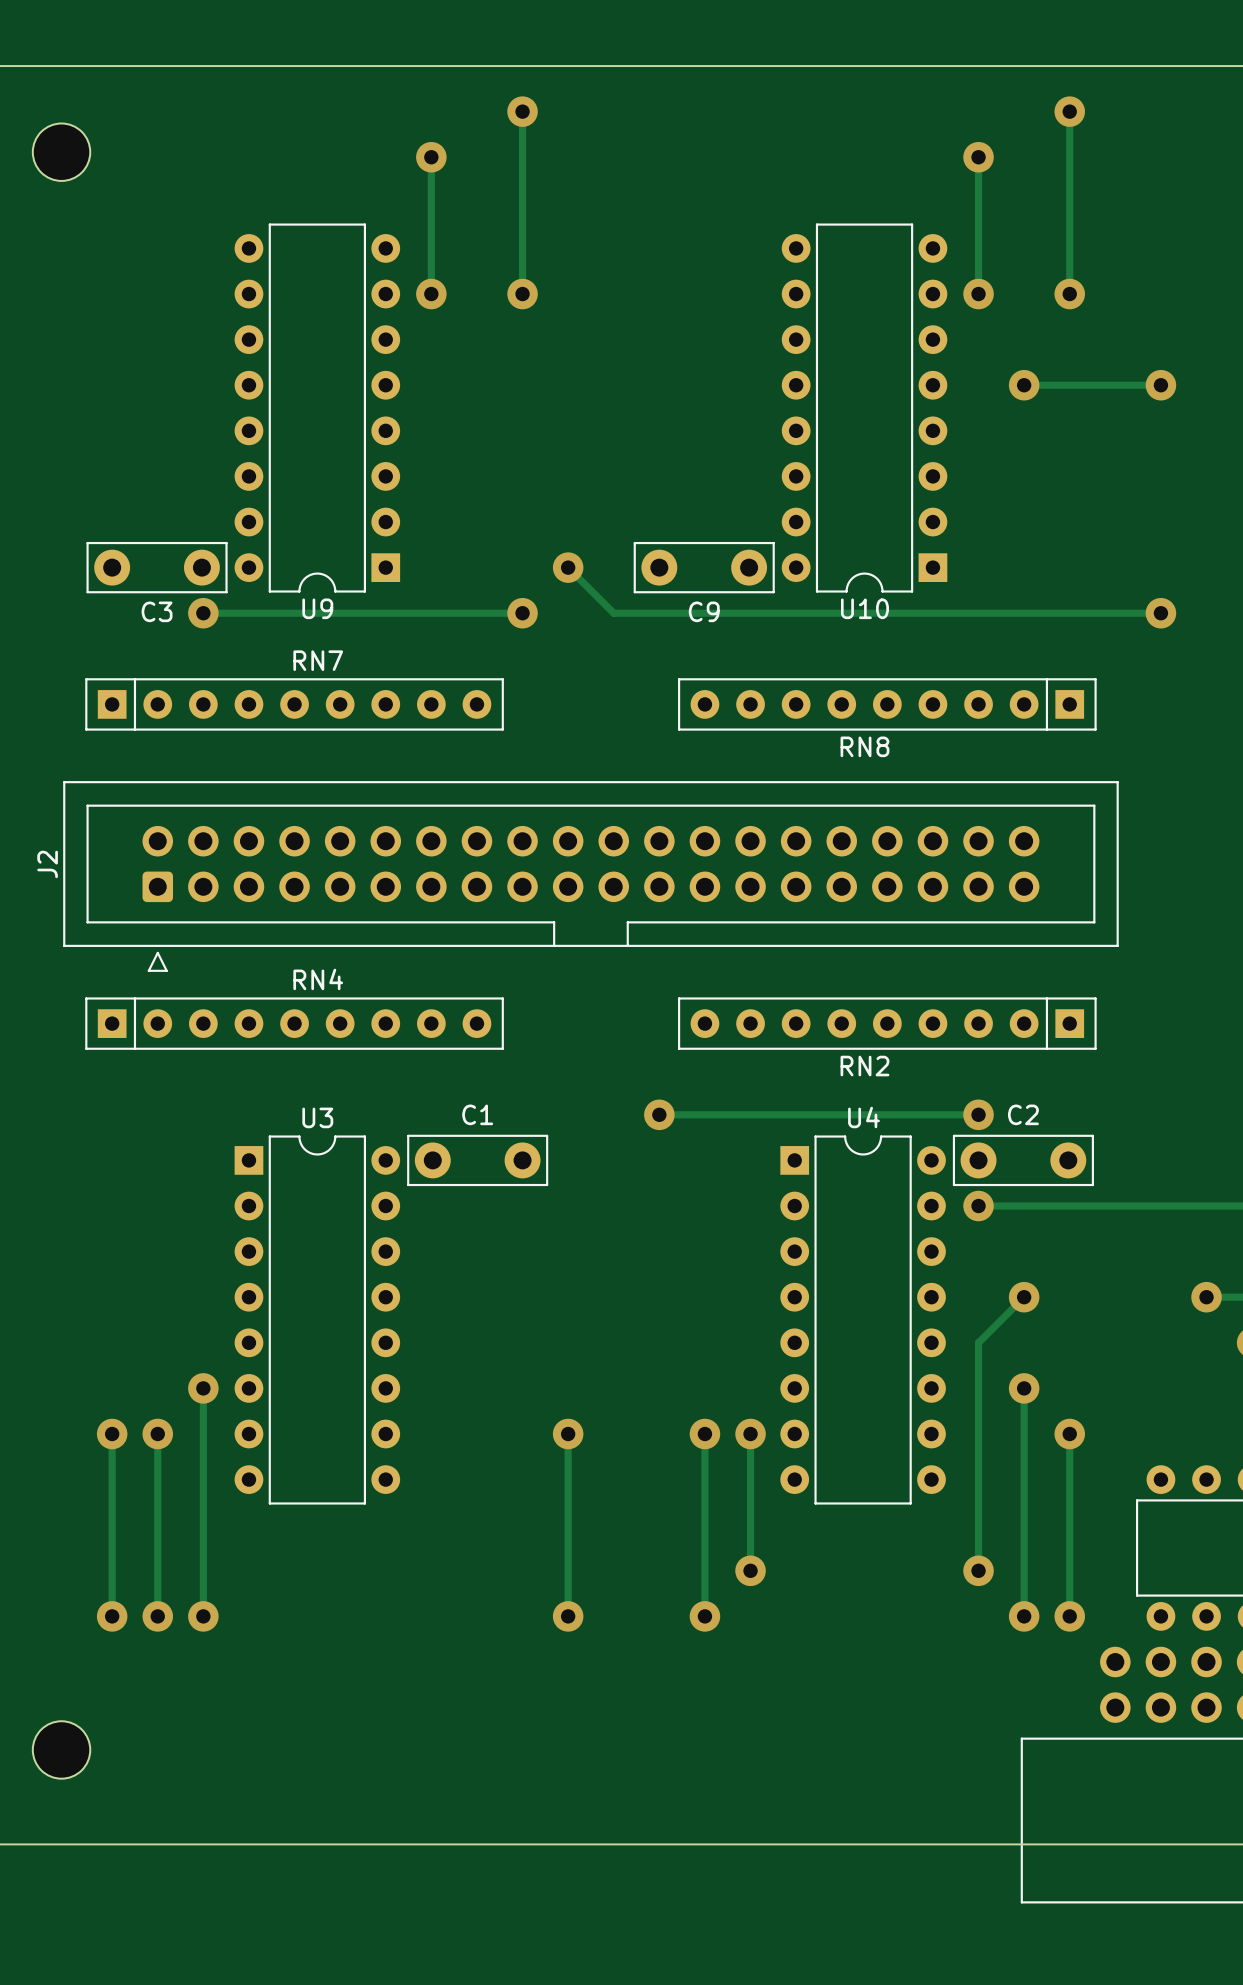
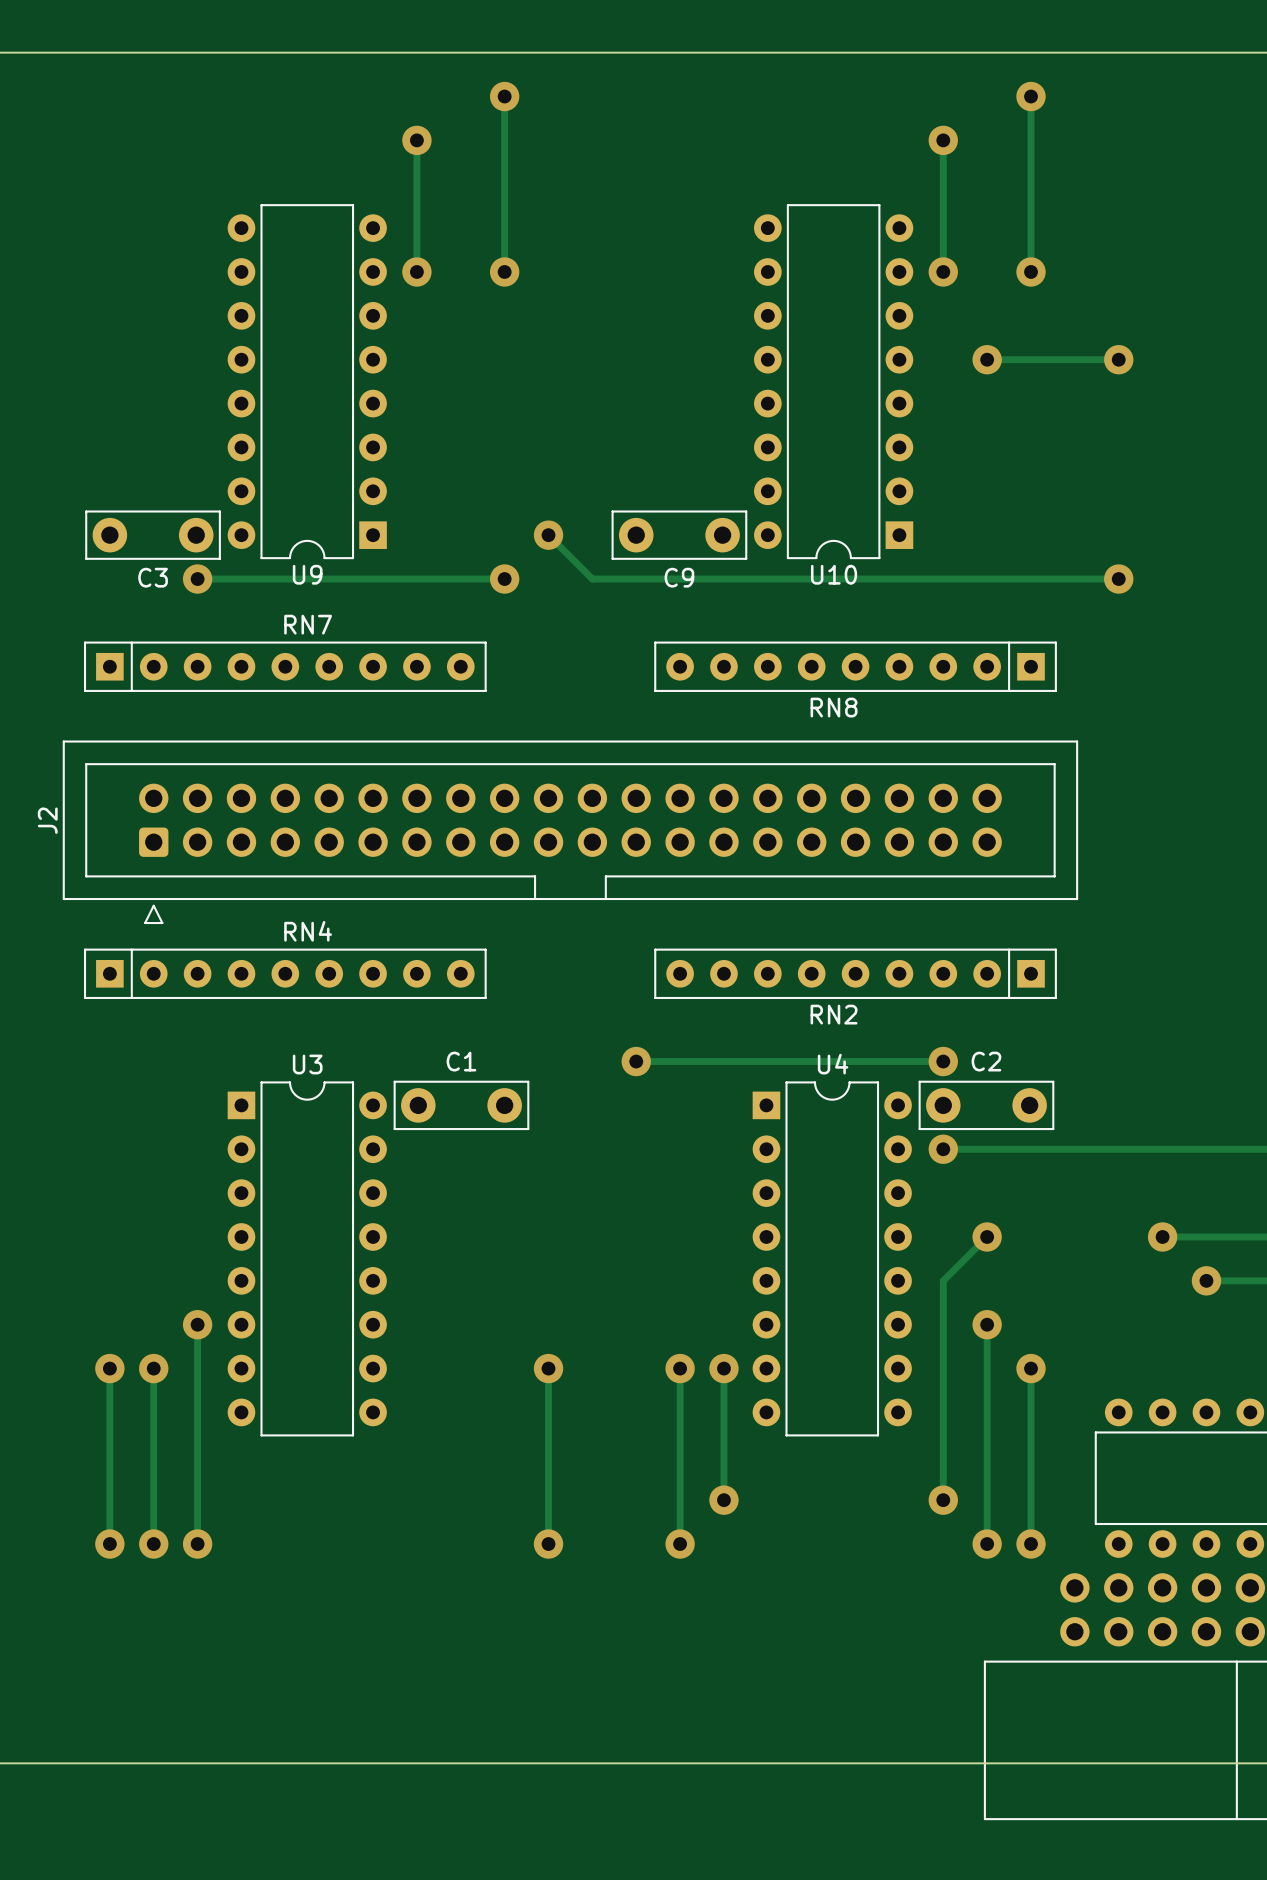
part: (61, 152) -> none
part: (61, 1749) -> none

